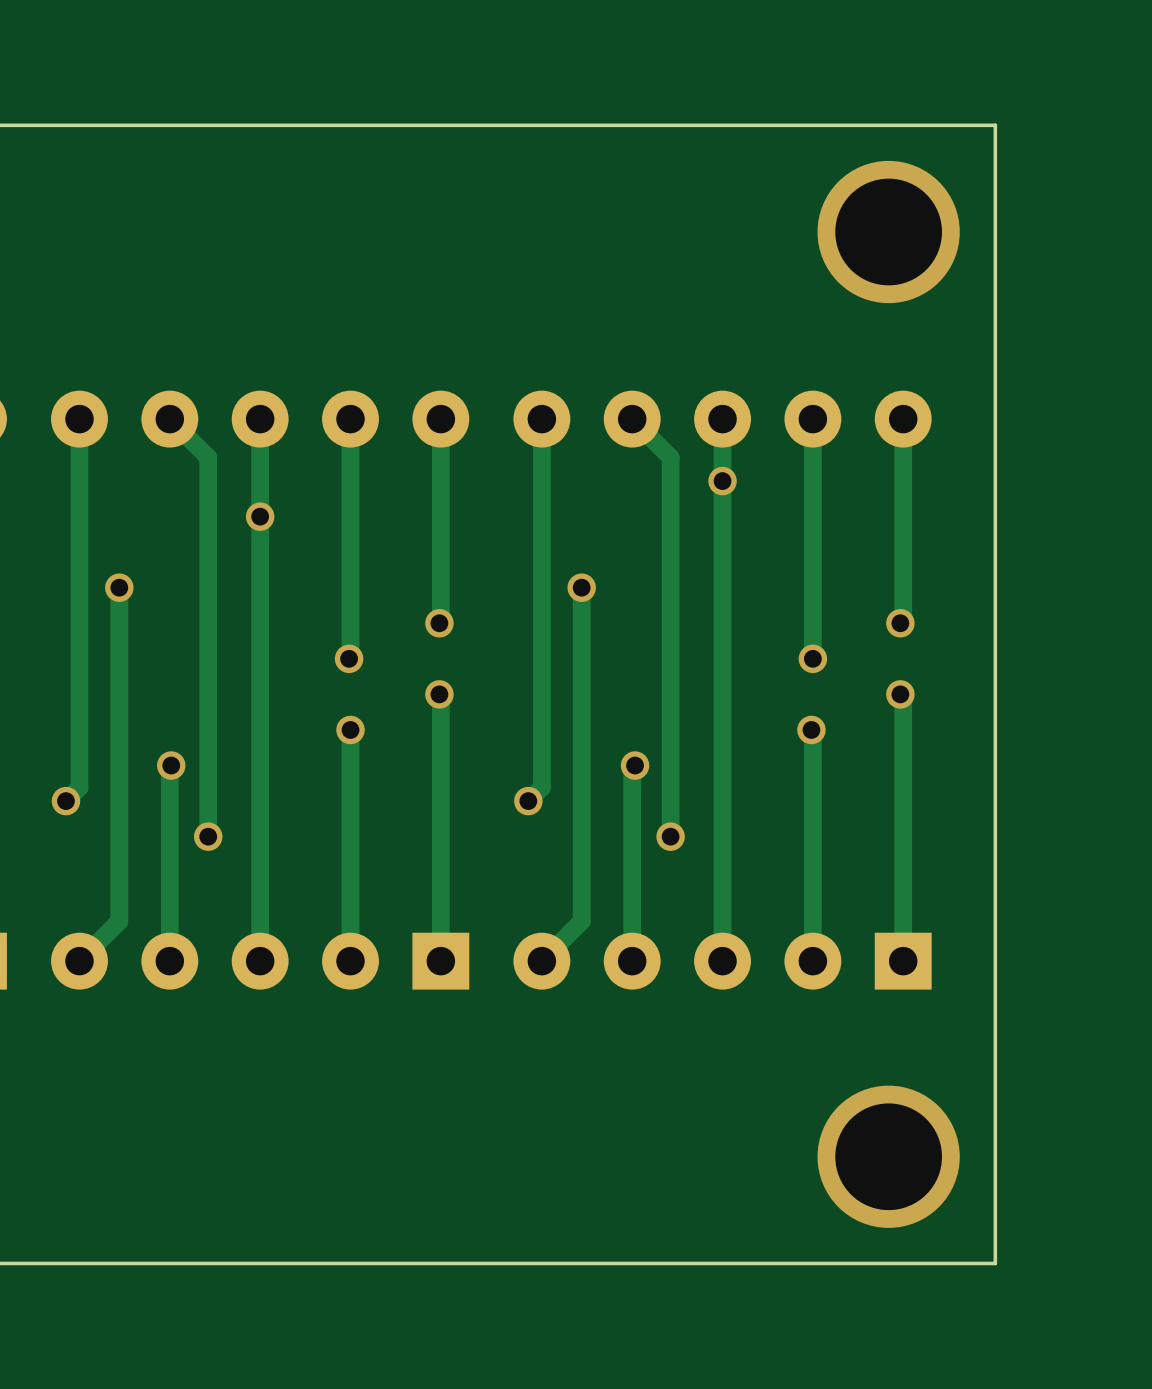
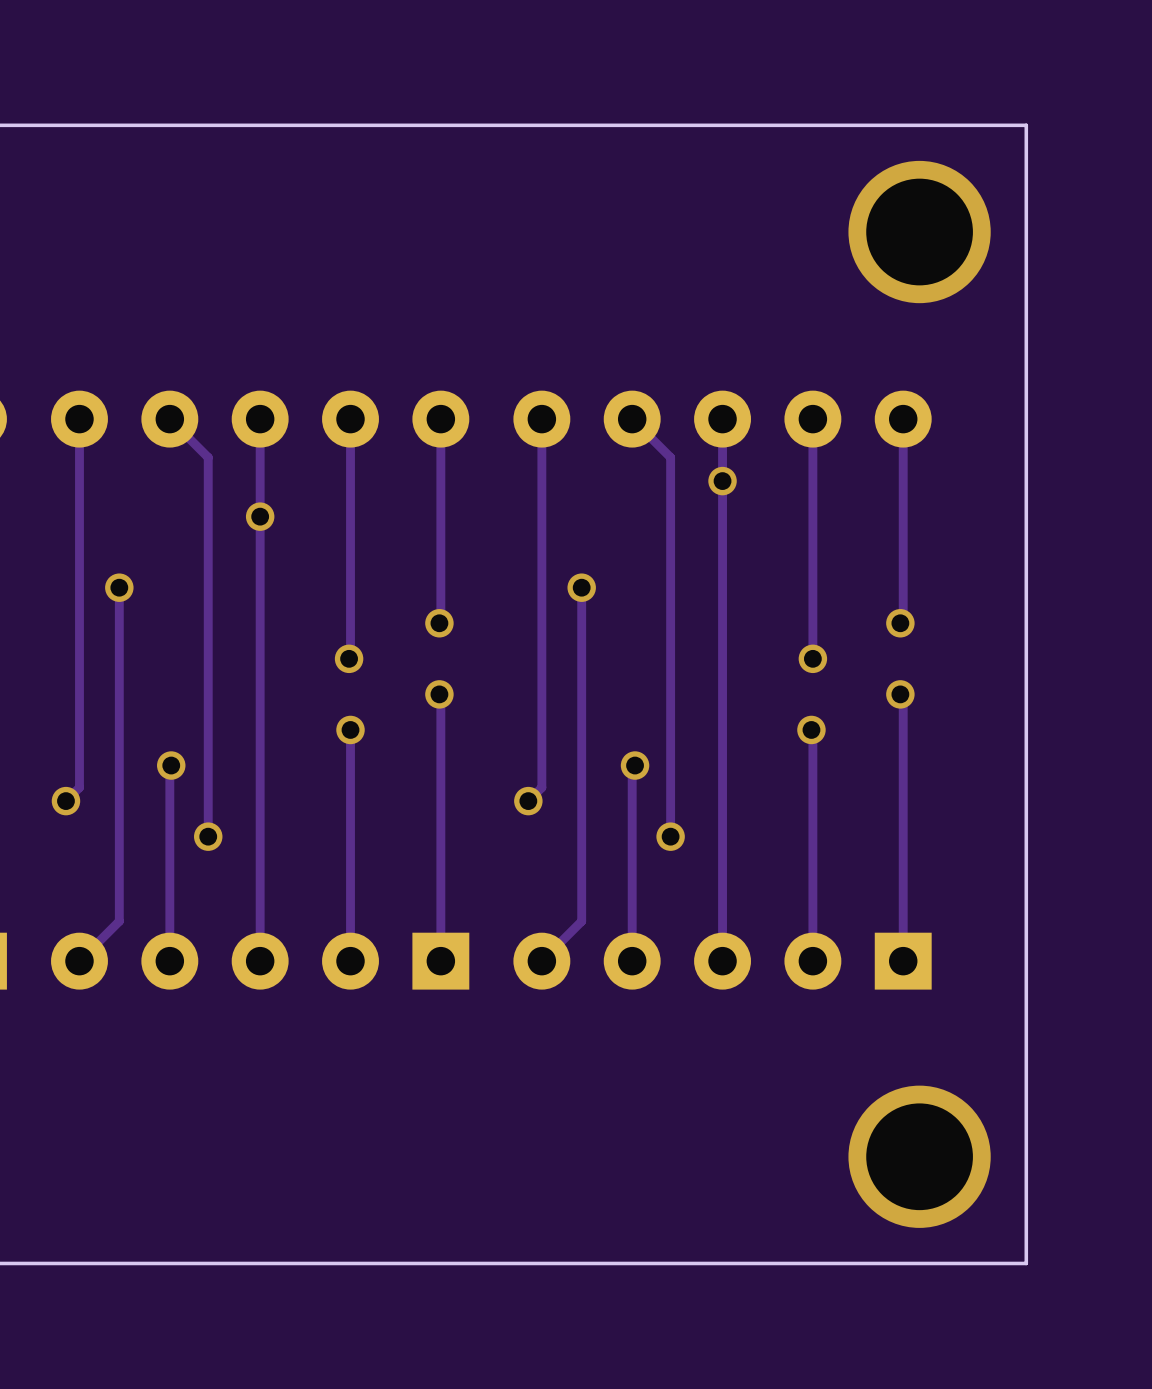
board edge: (995, 125) (995, 1263) -> (995, 125) (1026, 125) (1026, 1263) (995, 1263)
via position: (888, 232) -> (919, 232)
track width: thick (79, 419) (79, 787) (65, 801) -> thin (79, 419) (79, 787) (65, 801)
track width: thick (169, 419) (208, 457) (208, 836) -> thin (169, 419) (208, 457) (208, 836)
track width: thick (260, 419) (260, 961) -> thin (260, 419) (260, 961)
track width: thick (350, 419) (349, 658) -> thin (350, 419) (349, 658)
track width: thick (440, 419) (439, 623) -> thin (440, 419) (439, 623)
track width: thick (541, 419) (541, 787) (528, 801) -> thin (541, 419) (541, 787) (528, 801)
track width: thick (632, 419) (670, 457) (670, 836) -> thin (632, 419) (670, 457) (670, 836)
track width: thick (722, 419) (722, 961) -> thin (722, 419) (722, 961)
track width: thick (812, 419) (812, 658) -> thin (812, 419) (812, 658)
track width: thick (903, 419) (903, 620) (900, 623) -> thin (903, 419) (903, 620) (900, 623)
track width: thick (119, 587) (119, 921) (79, 961) -> thin (119, 587) (119, 921) (79, 961)
track width: thick (581, 587) (581, 921) (541, 961) -> thin (581, 587) (581, 921) (541, 961)
track width: thick (439, 694) (440, 961) -> thin (439, 694) (440, 961)
track width: thick (900, 694) (903, 697) (903, 961) -> thin (900, 694) (903, 697) (903, 961)
track width: thick (350, 729) (350, 961) -> thin (350, 729) (350, 961)
track width: thick (811, 729) (812, 961) -> thin (811, 729) (812, 961)
track width: thick (171, 765) (169, 961) -> thin (171, 765) (169, 961)
track width: thick (635, 765) (632, 768) (632, 961) -> thin (635, 765) (632, 768) (632, 961)
via position: (888, 1156) -> (919, 1156)

